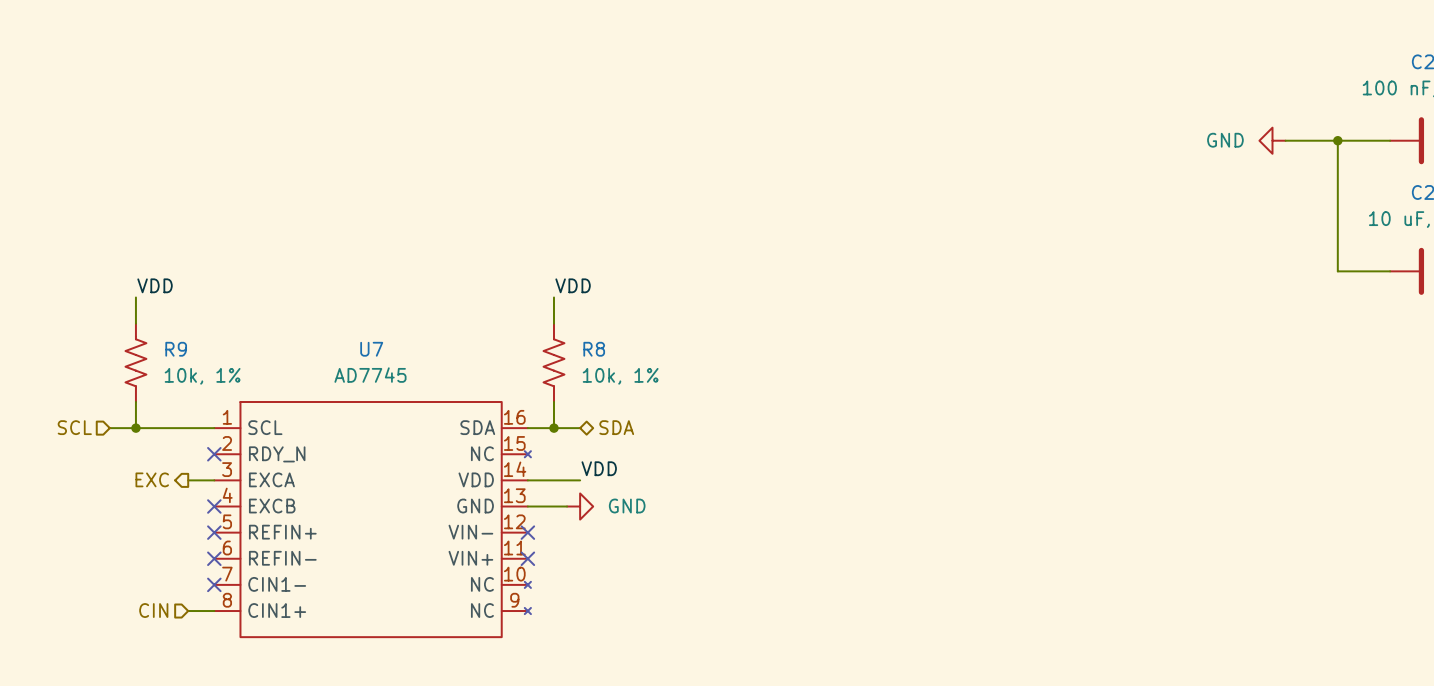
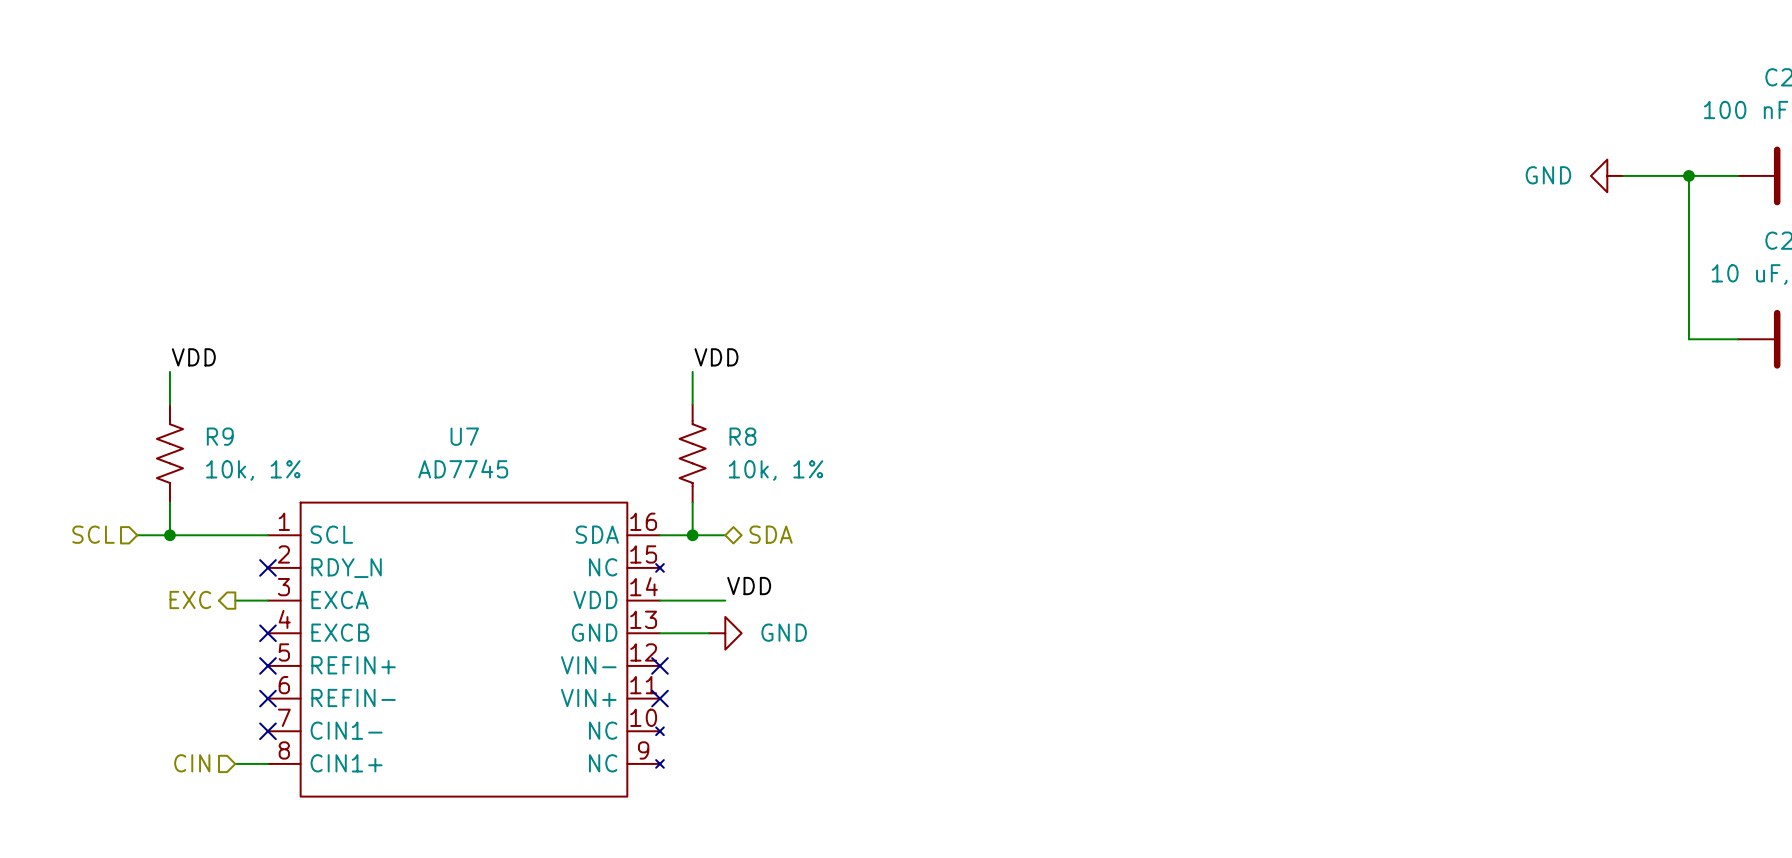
power symbol position: GND (1272, 140) -> GND (1607, 175)
wire: (1337, 140) (1337, 271) (1350, 271) -> (1688, 175) (1688, 339)
junction position: (1337, 140) -> (1688, 175)

